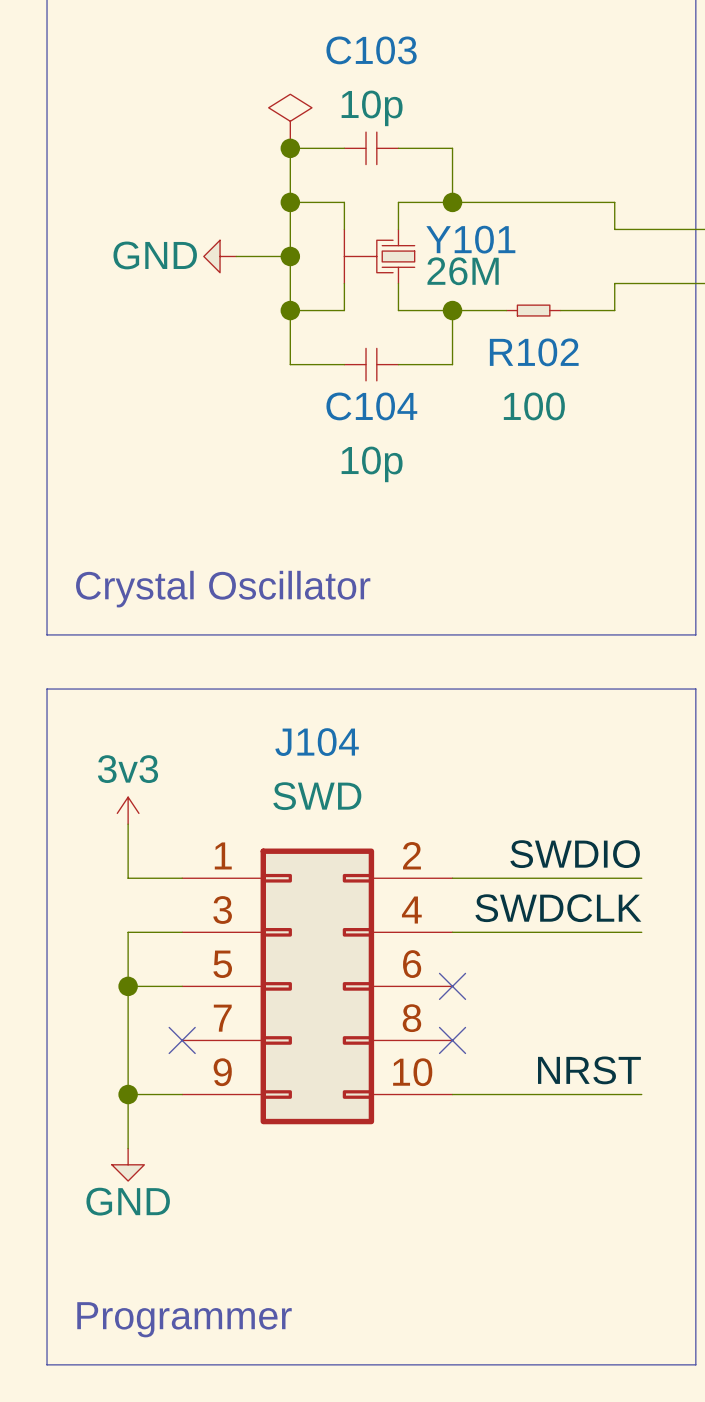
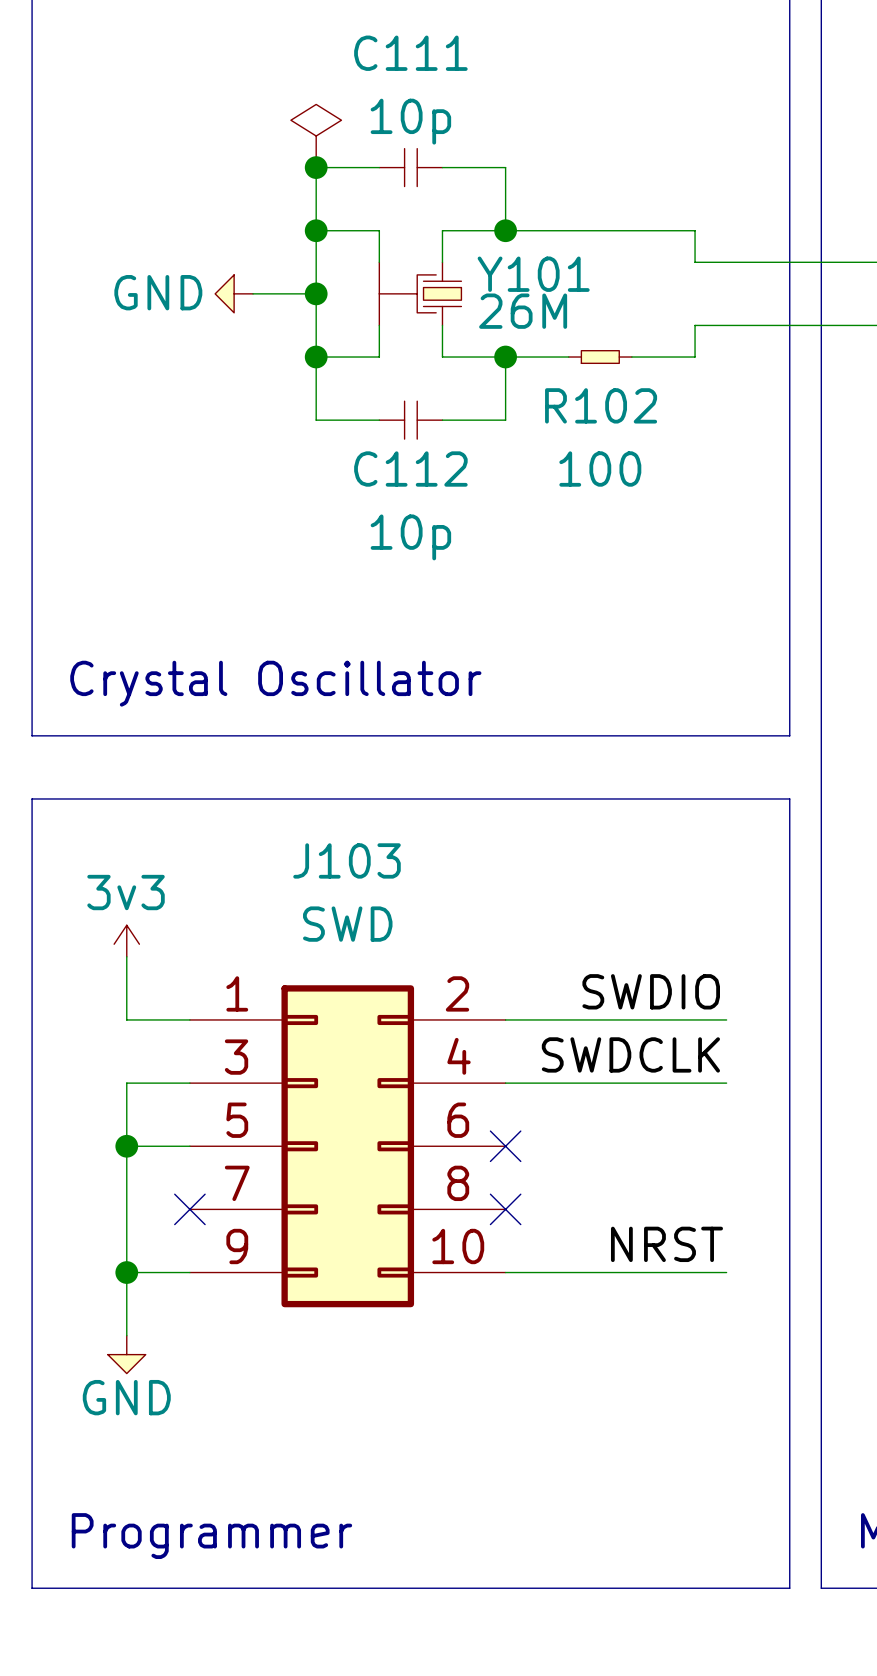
C103 name: C103 (371, 50) -> C111 (410, 53)
C104 name: C104 (371, 406) -> C112 (410, 469)
J104 name: J104 (317, 742) -> J103 (347, 860)

